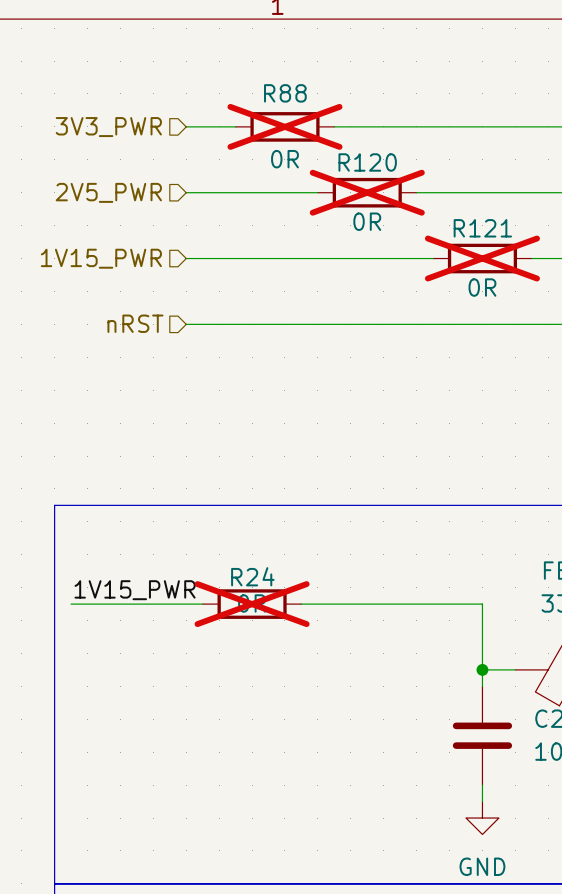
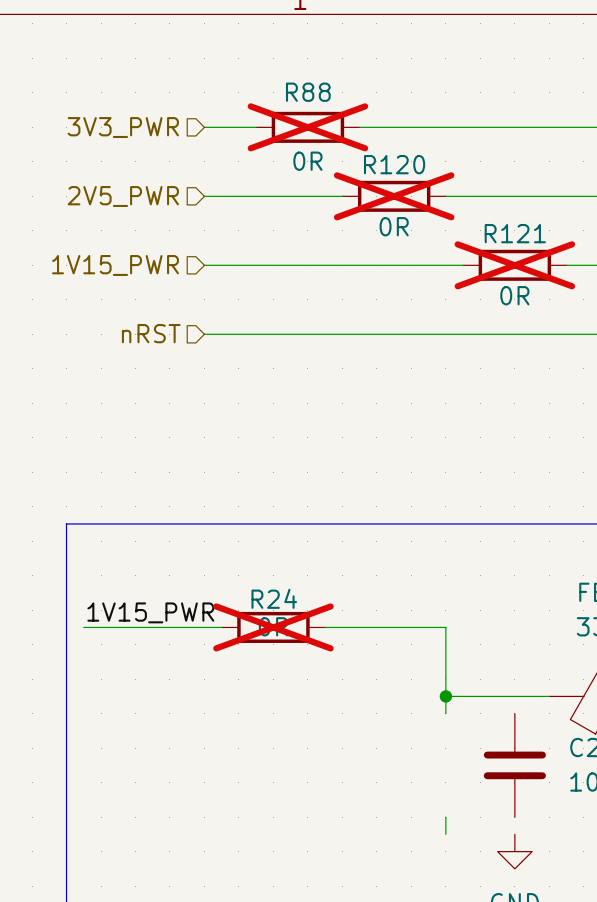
wire: (416, 604) (482, 604) (482, 686) -> (445, 627) (445, 713)
wire: none -> (445, 696) (514, 696)
junction position: (482, 669) -> (445, 696)
wire: (482, 785) (482, 801) -> (445, 817) (445, 834)

